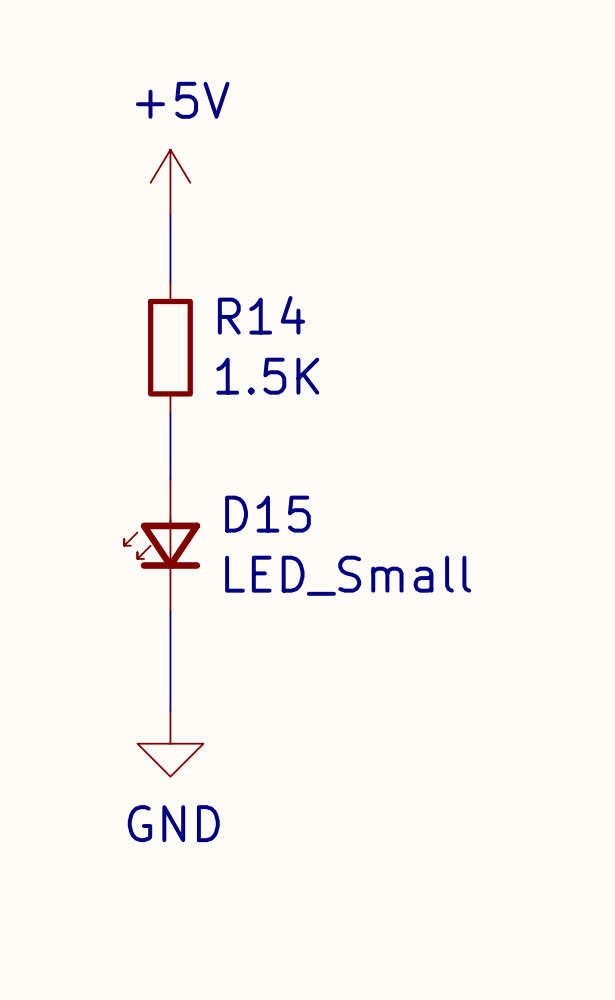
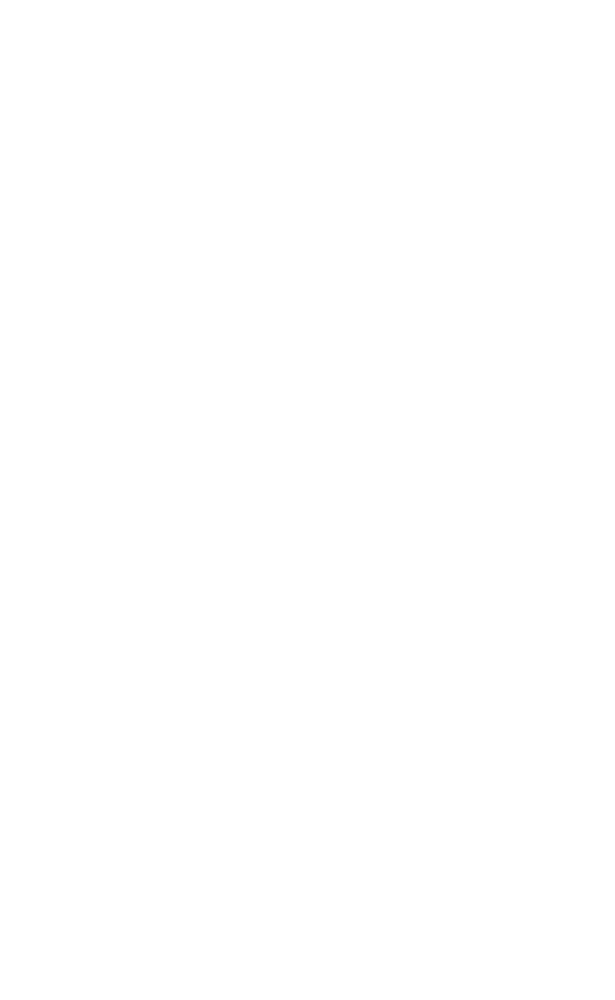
power symbol: +5V (170, 182) -> none
wire: (170, 215) (170, 281) -> none
R14: 1.5K (170, 347) -> none
wire: (170, 413) (170, 479) -> none
D15: LED_Small (162, 545) -> none
wire: (170, 611) (170, 710) -> none
power symbol: GND (170, 743) -> none

